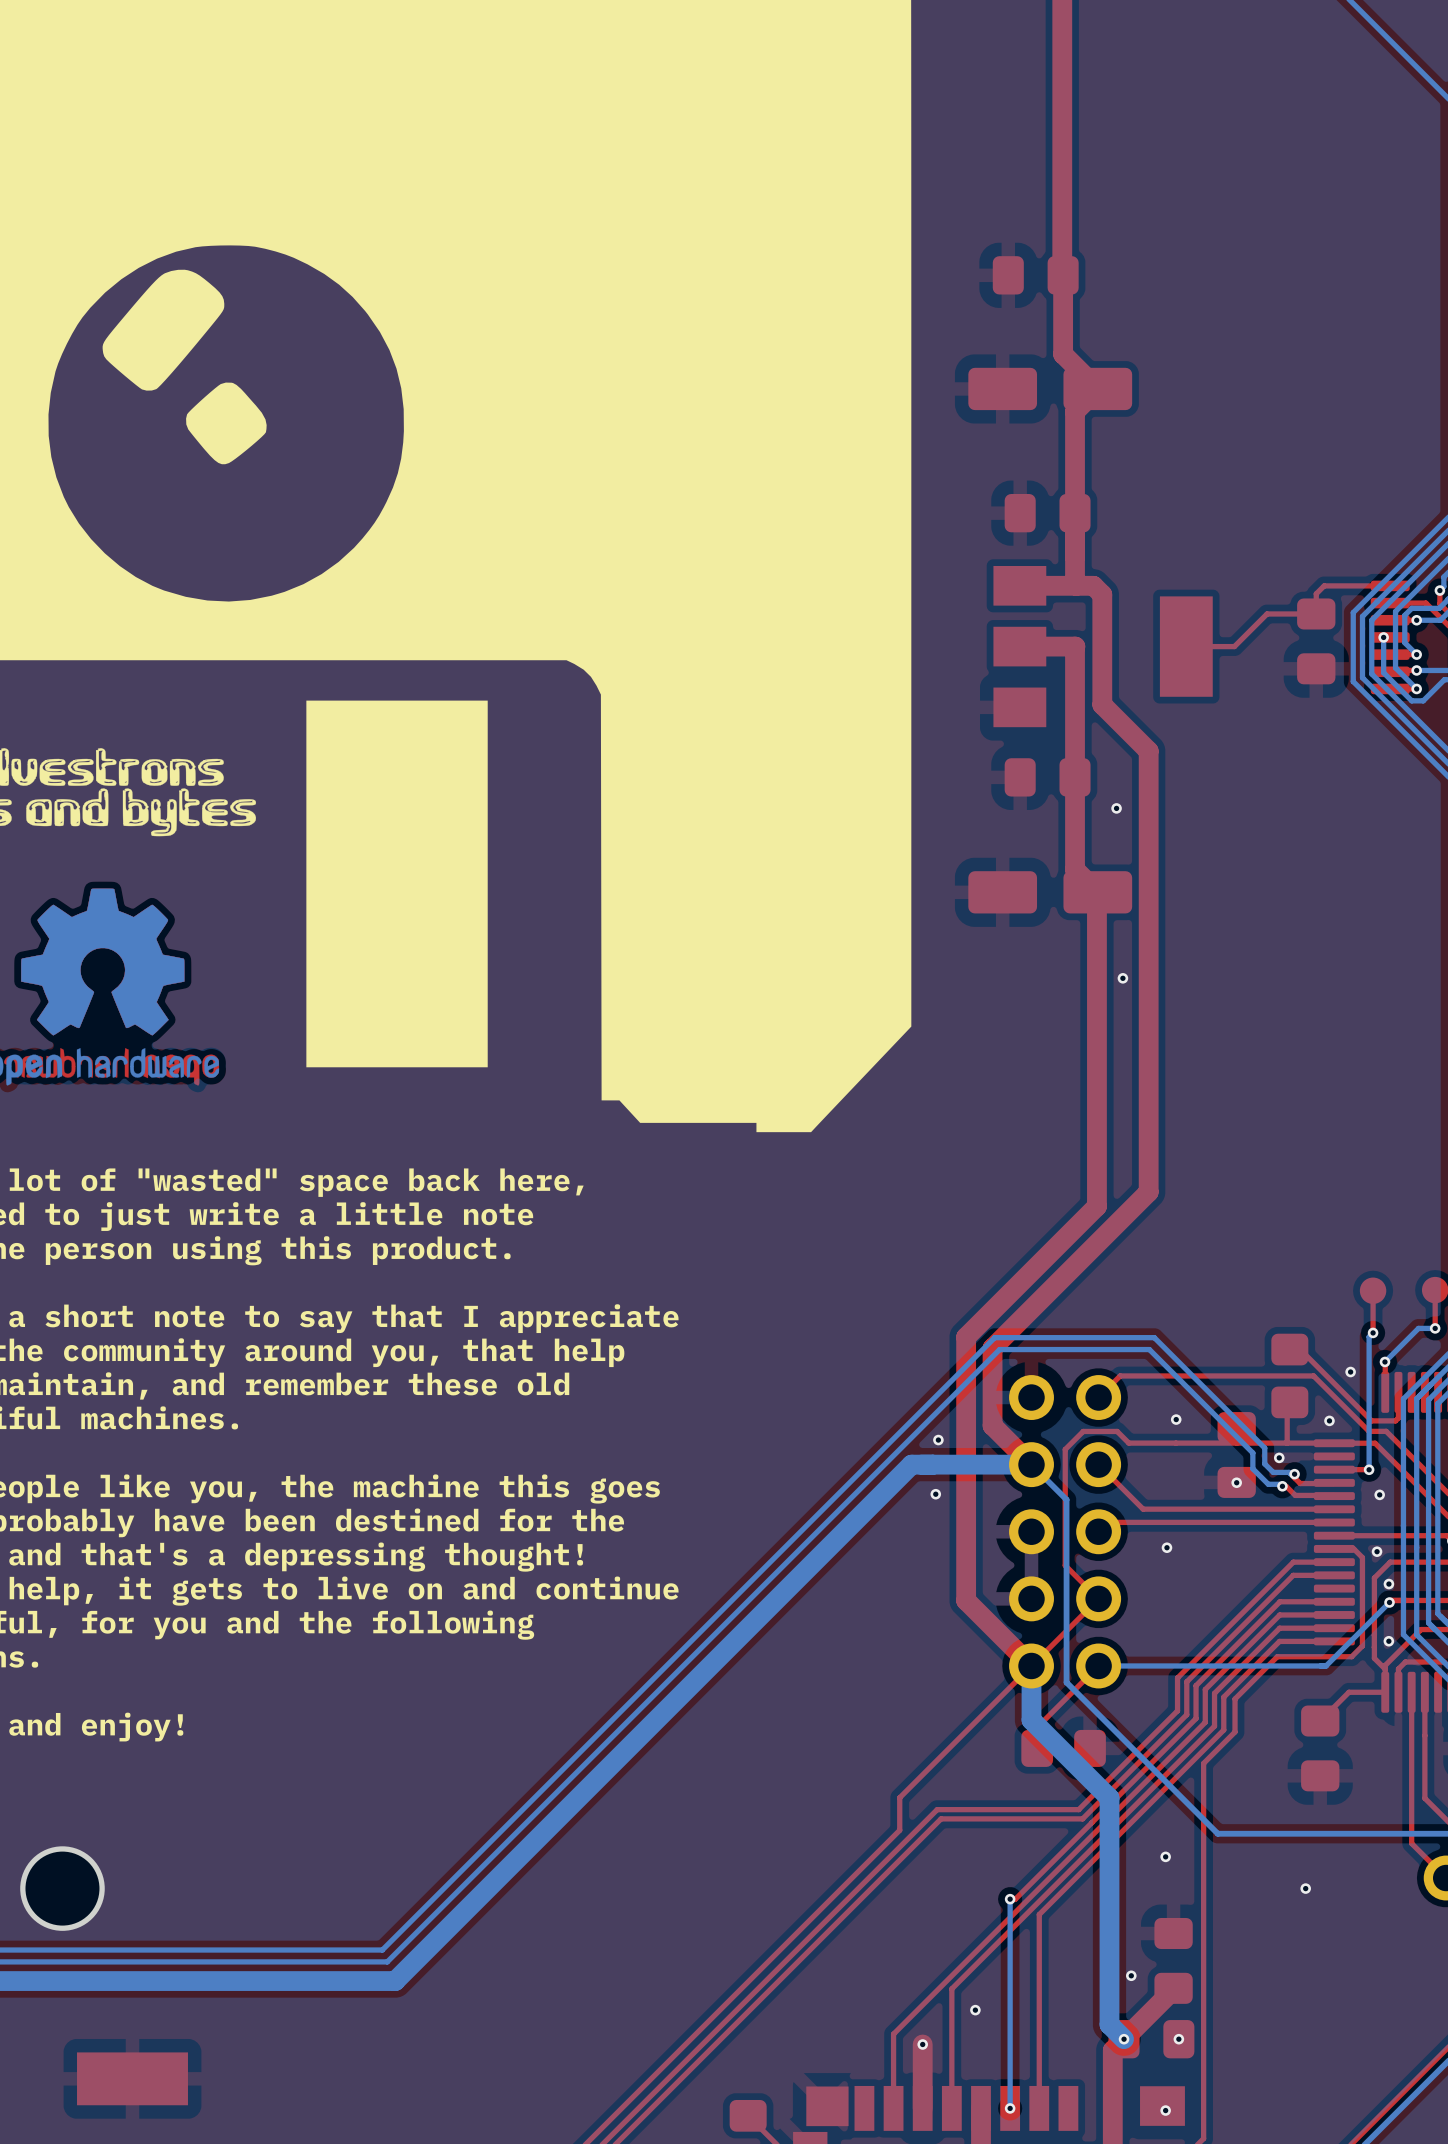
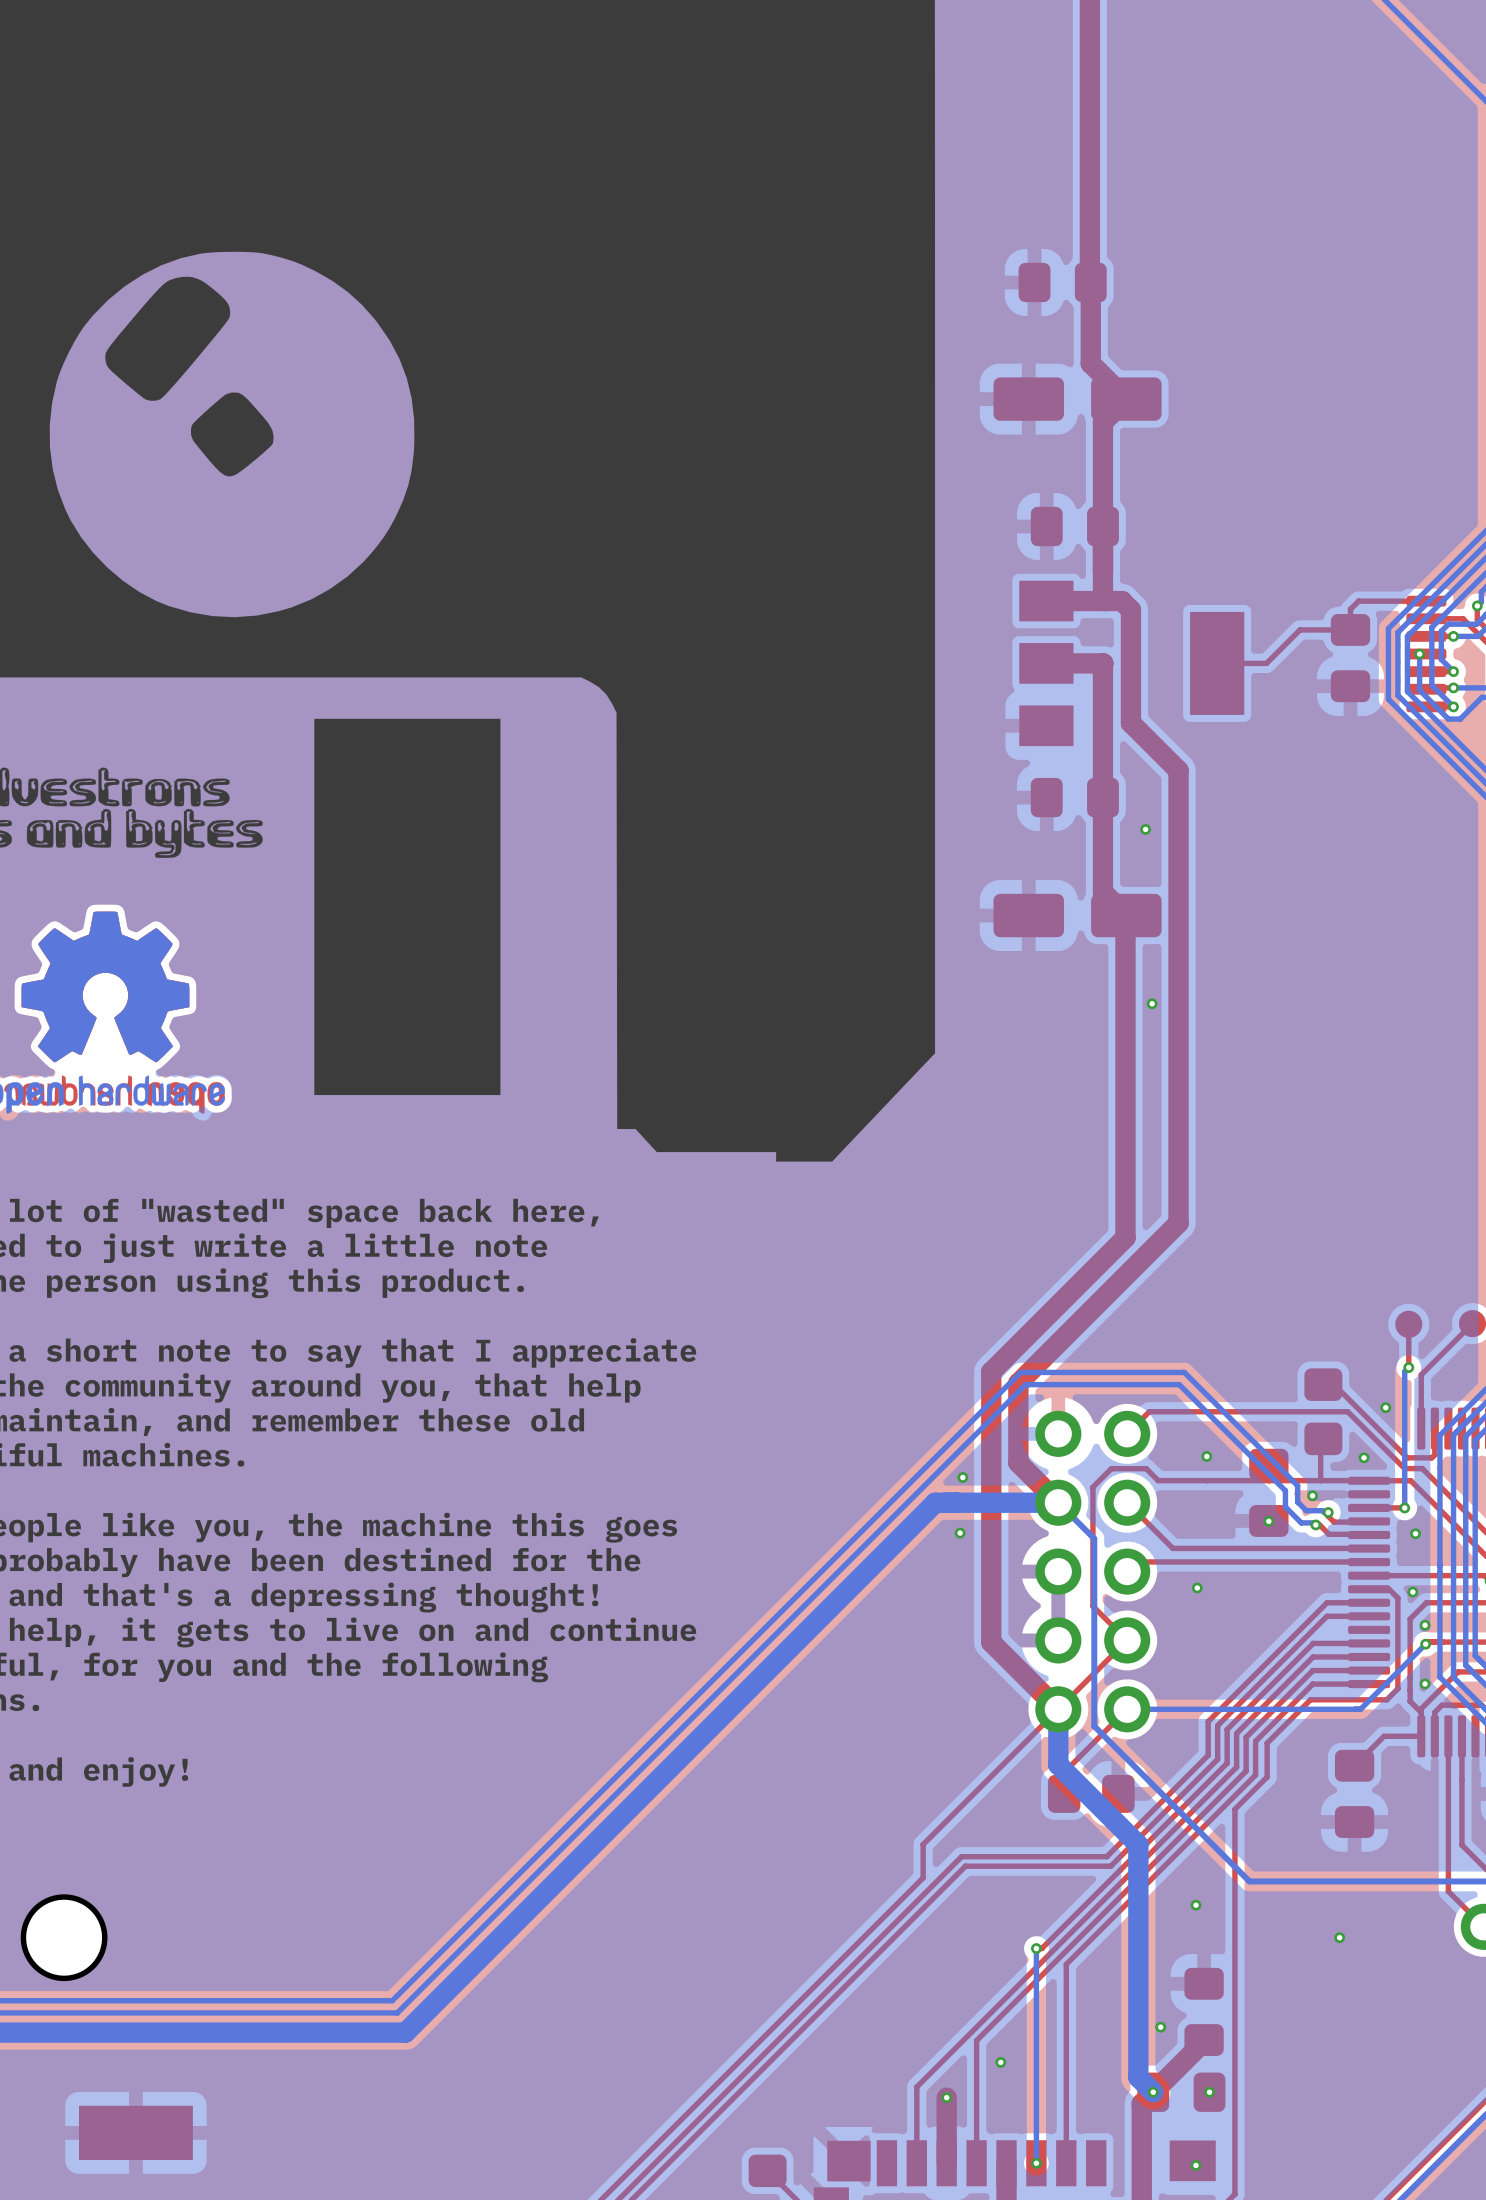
top track: (1435, 1290) (1435, 1328) -> (1472, 1323) (1421, 1374) (1421, 1397)
bottom track: (1435, 1328) (1418, 1328) (1384, 1361) -> none
via: (1435, 1328) -> none
via: (1384, 1361) -> none

